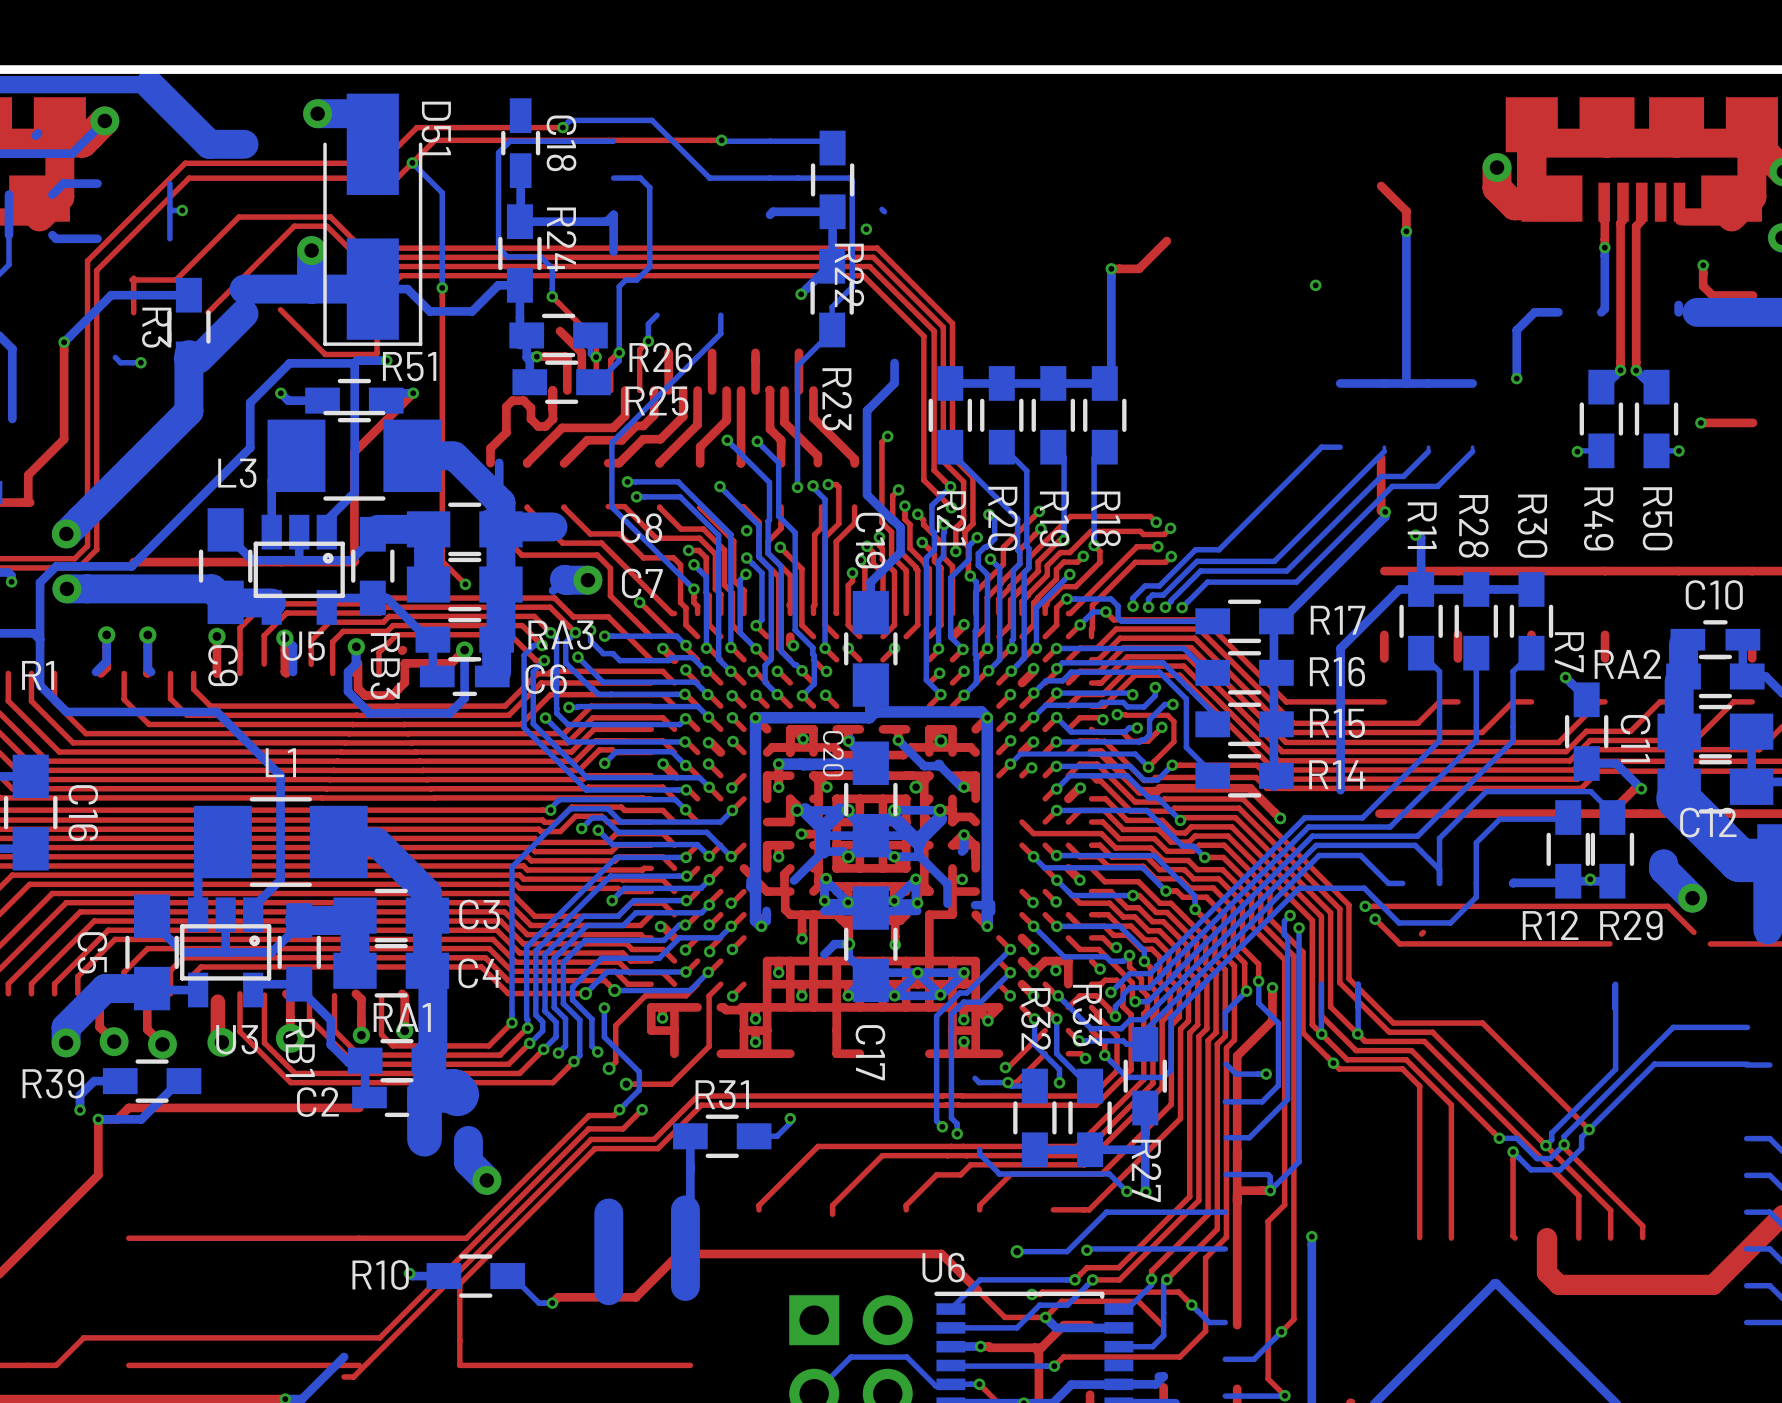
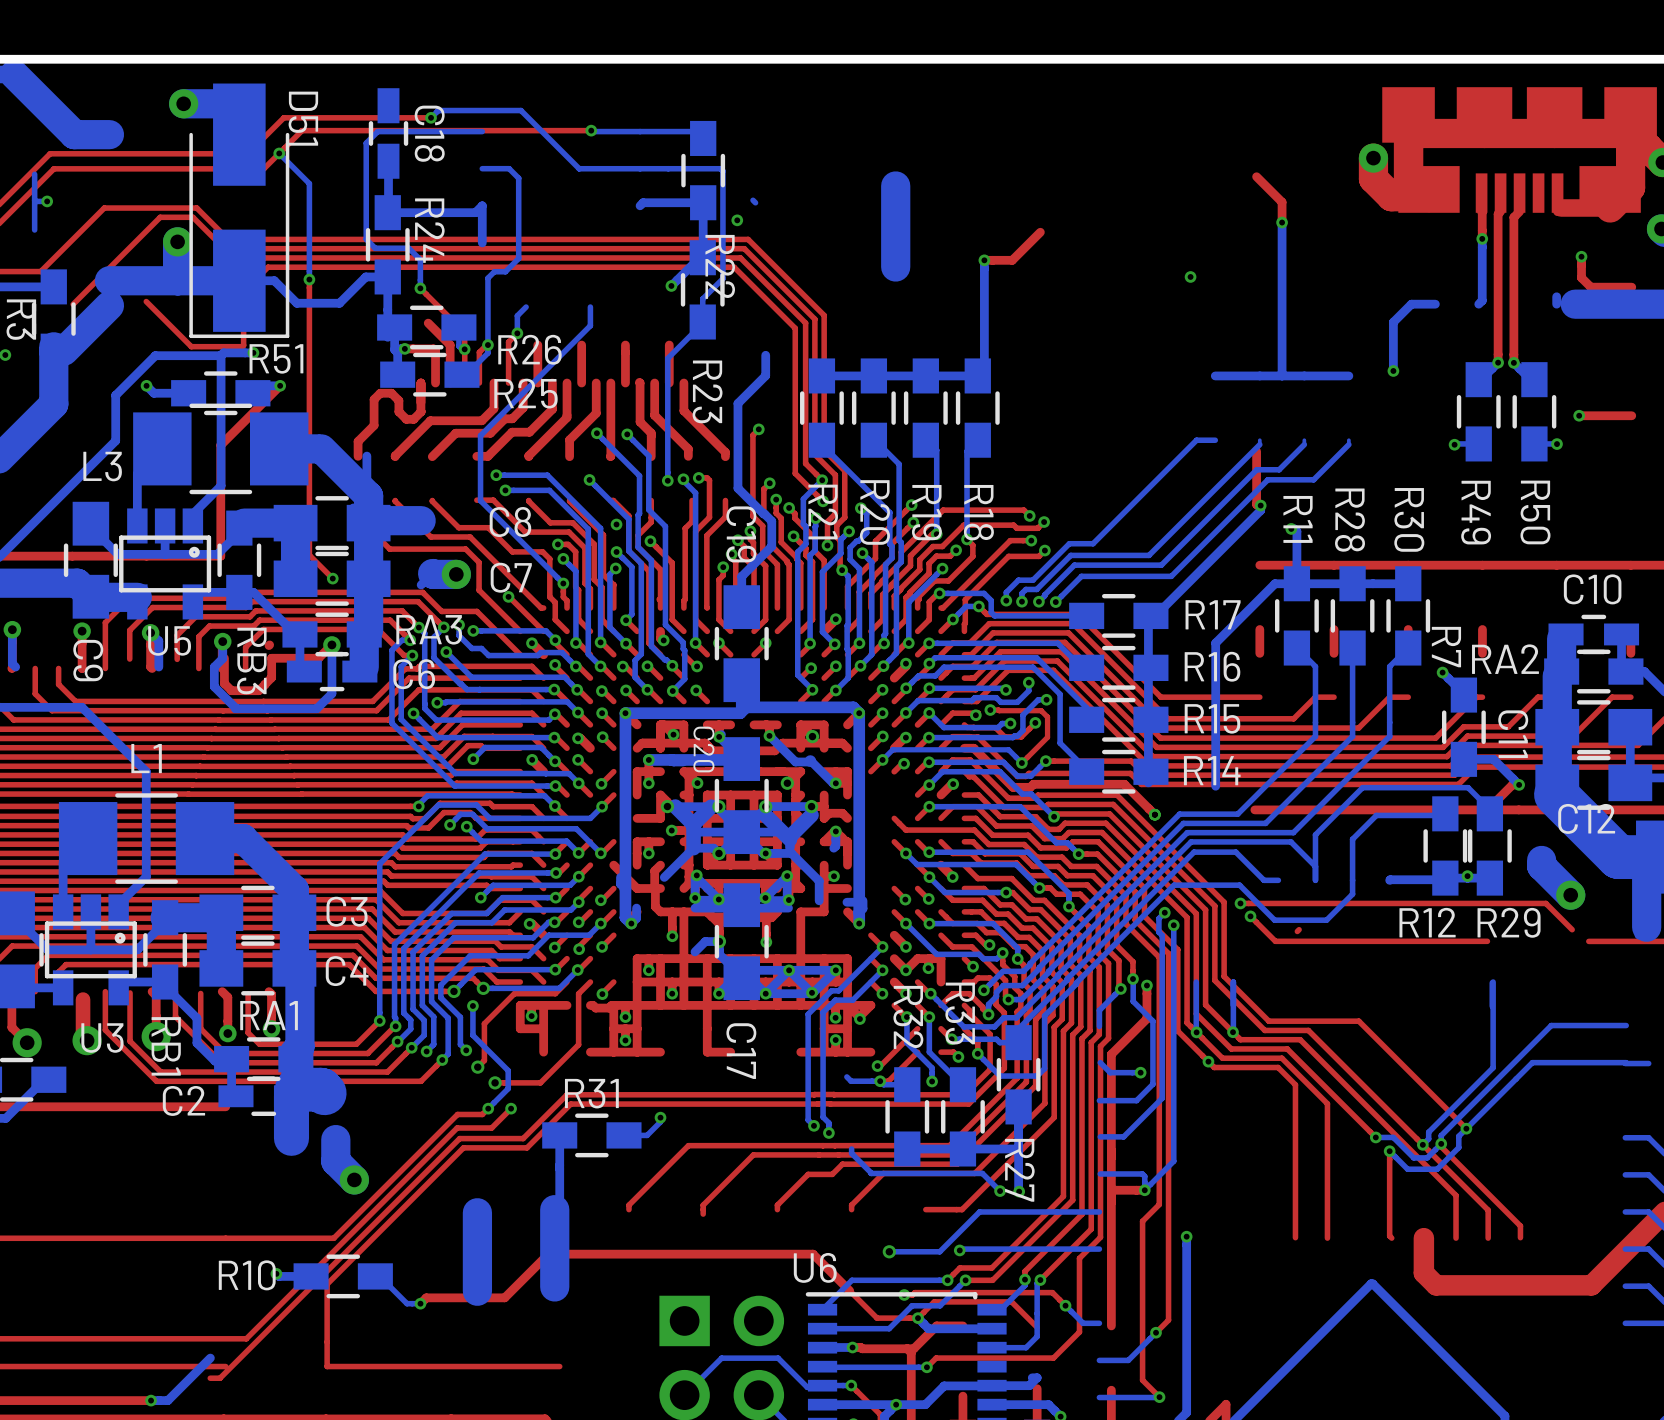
bottom track: none -> (895, 185) (895, 267)

